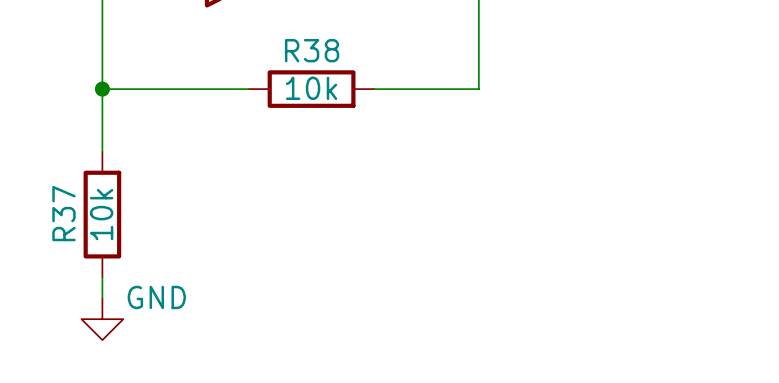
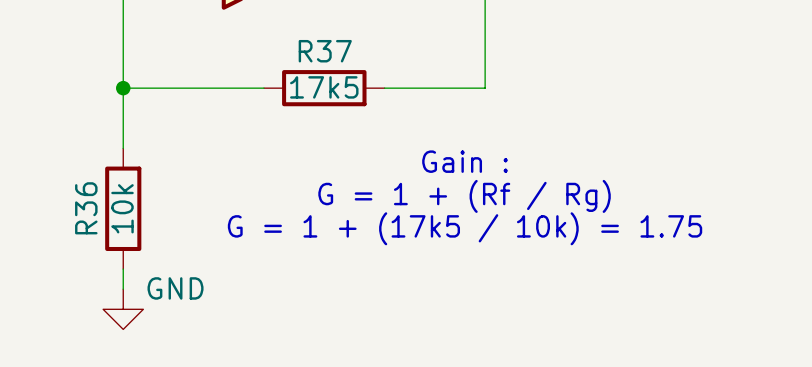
R38 name: R38 (312, 50) -> R37 (325, 51)
R38 value: 10k (311, 88) -> 17k5 (324, 87)
text: none -> Gain : (465, 161)
text: none -> G = 1 + (Rf / Rg) (464, 196)
R37 name: R37 (63, 213) -> R36 (86, 208)
text: none -> G = 1 + (17k5 / 10k) = 1.75 (465, 228)

